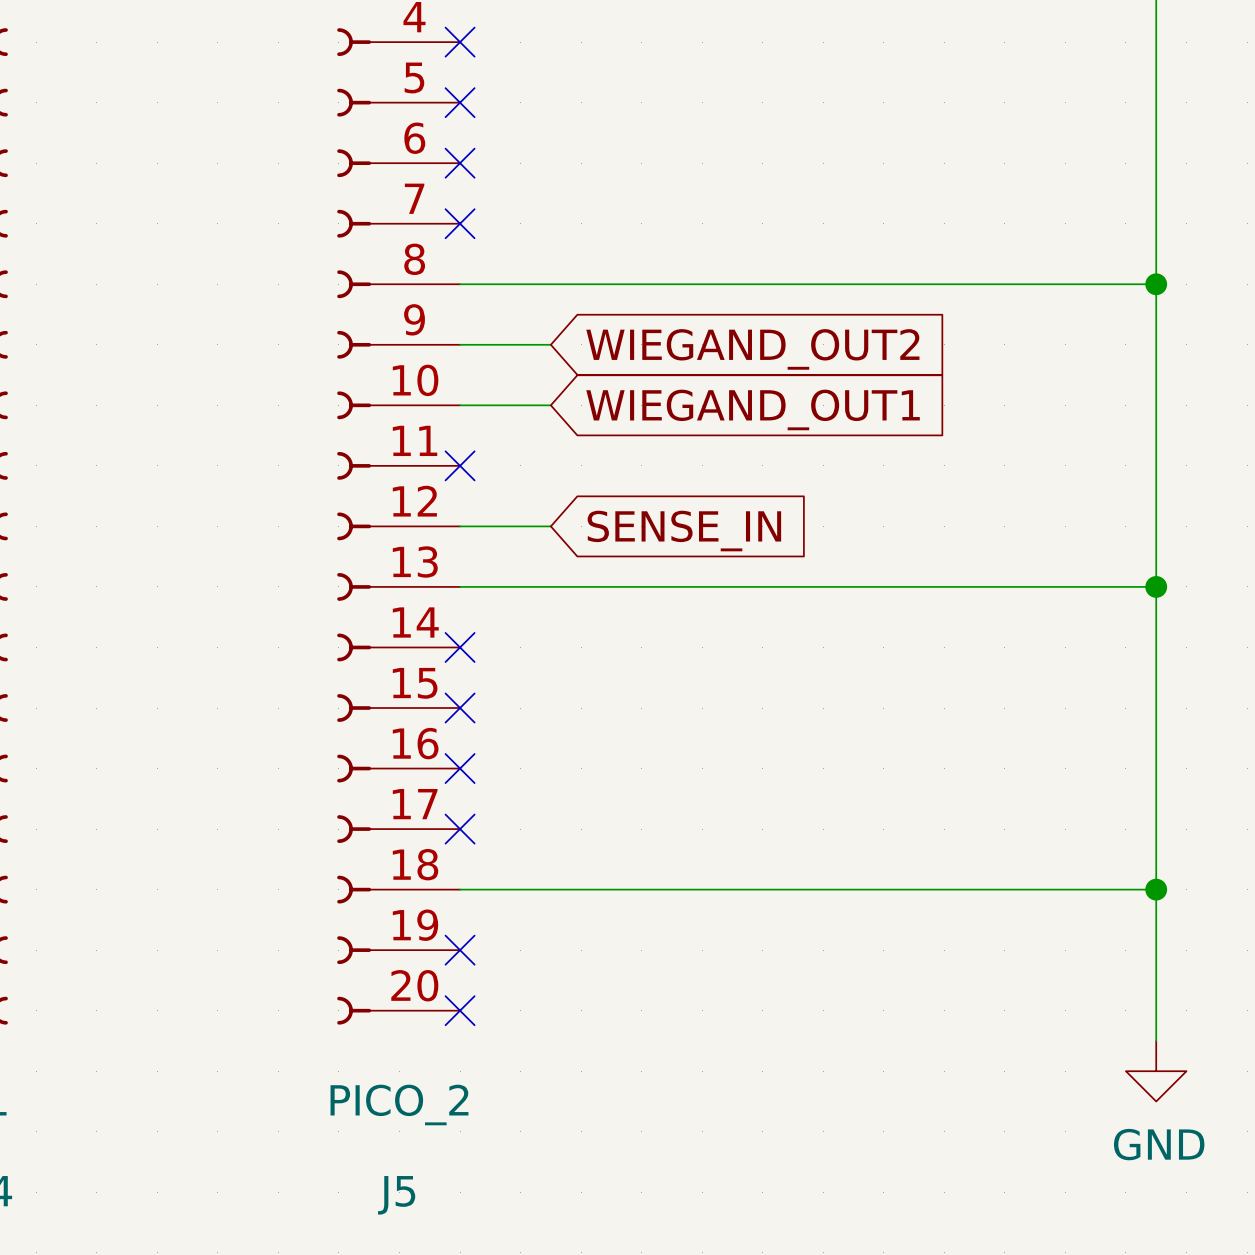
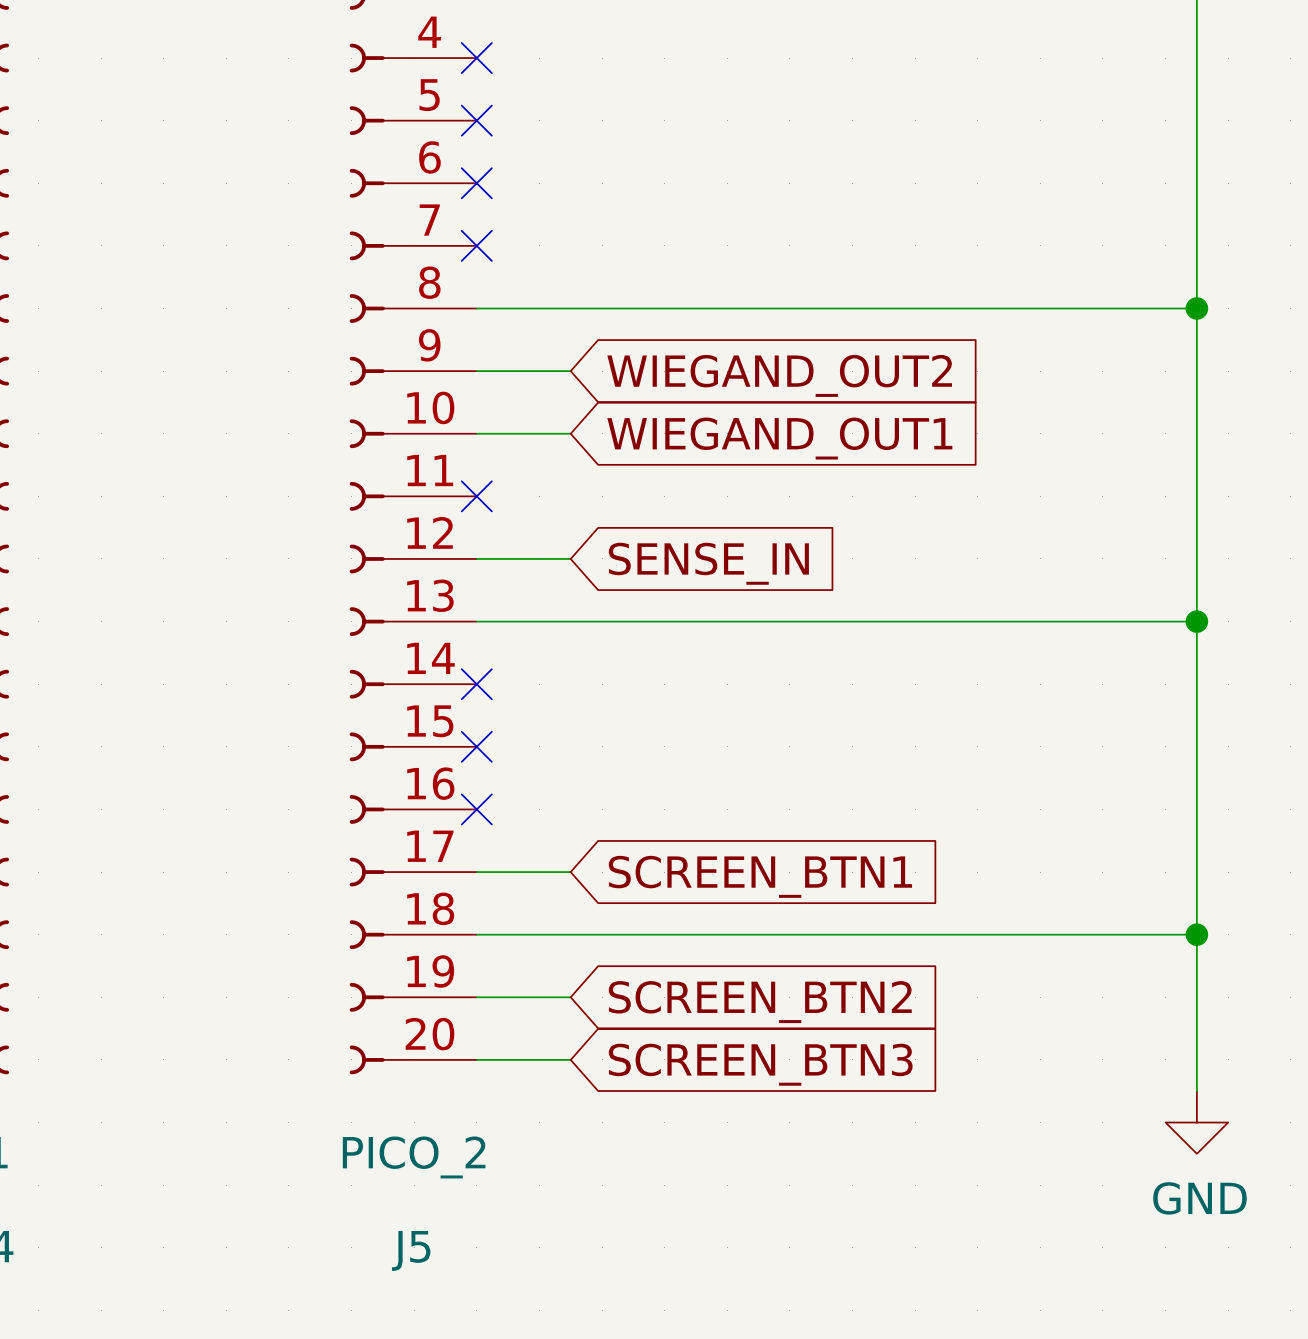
wire: none -> (476, 872) (570, 872)
no-connect mark: (460, 829) -> none
global label: none -> SCREEN_BTN1 (760, 876)
wire: none -> (476, 997) (570, 997)
no-connect mark: (460, 950) -> none
global label: none -> SCREEN_BTN2 (760, 1002)
wire: none -> (476, 1059) (570, 1059)
no-connect mark: (460, 1010) -> none
global label: none -> SCREEN_BTN3 (760, 1064)

